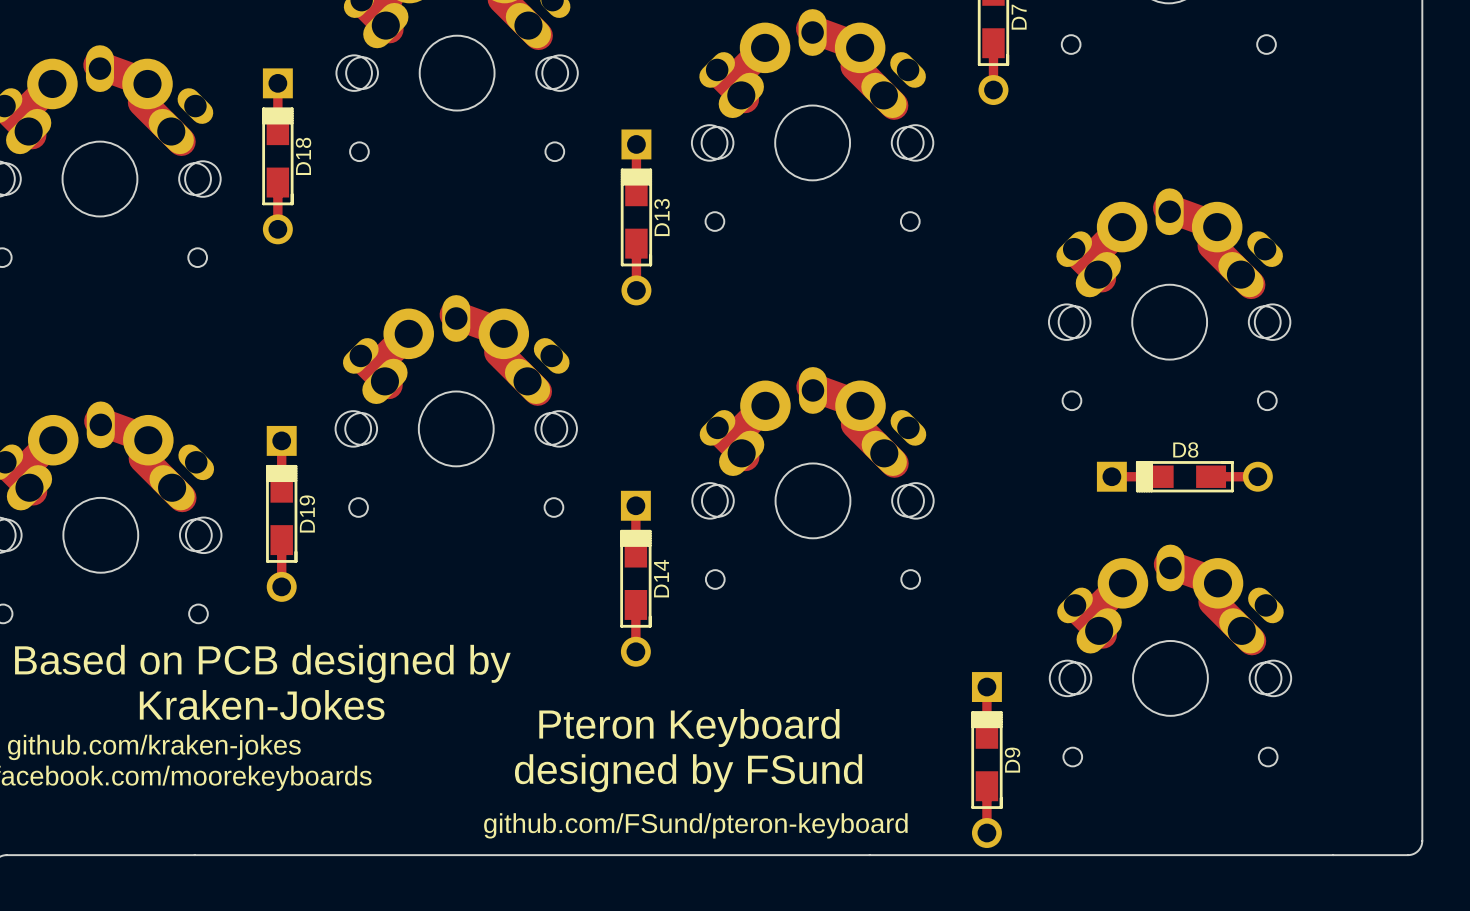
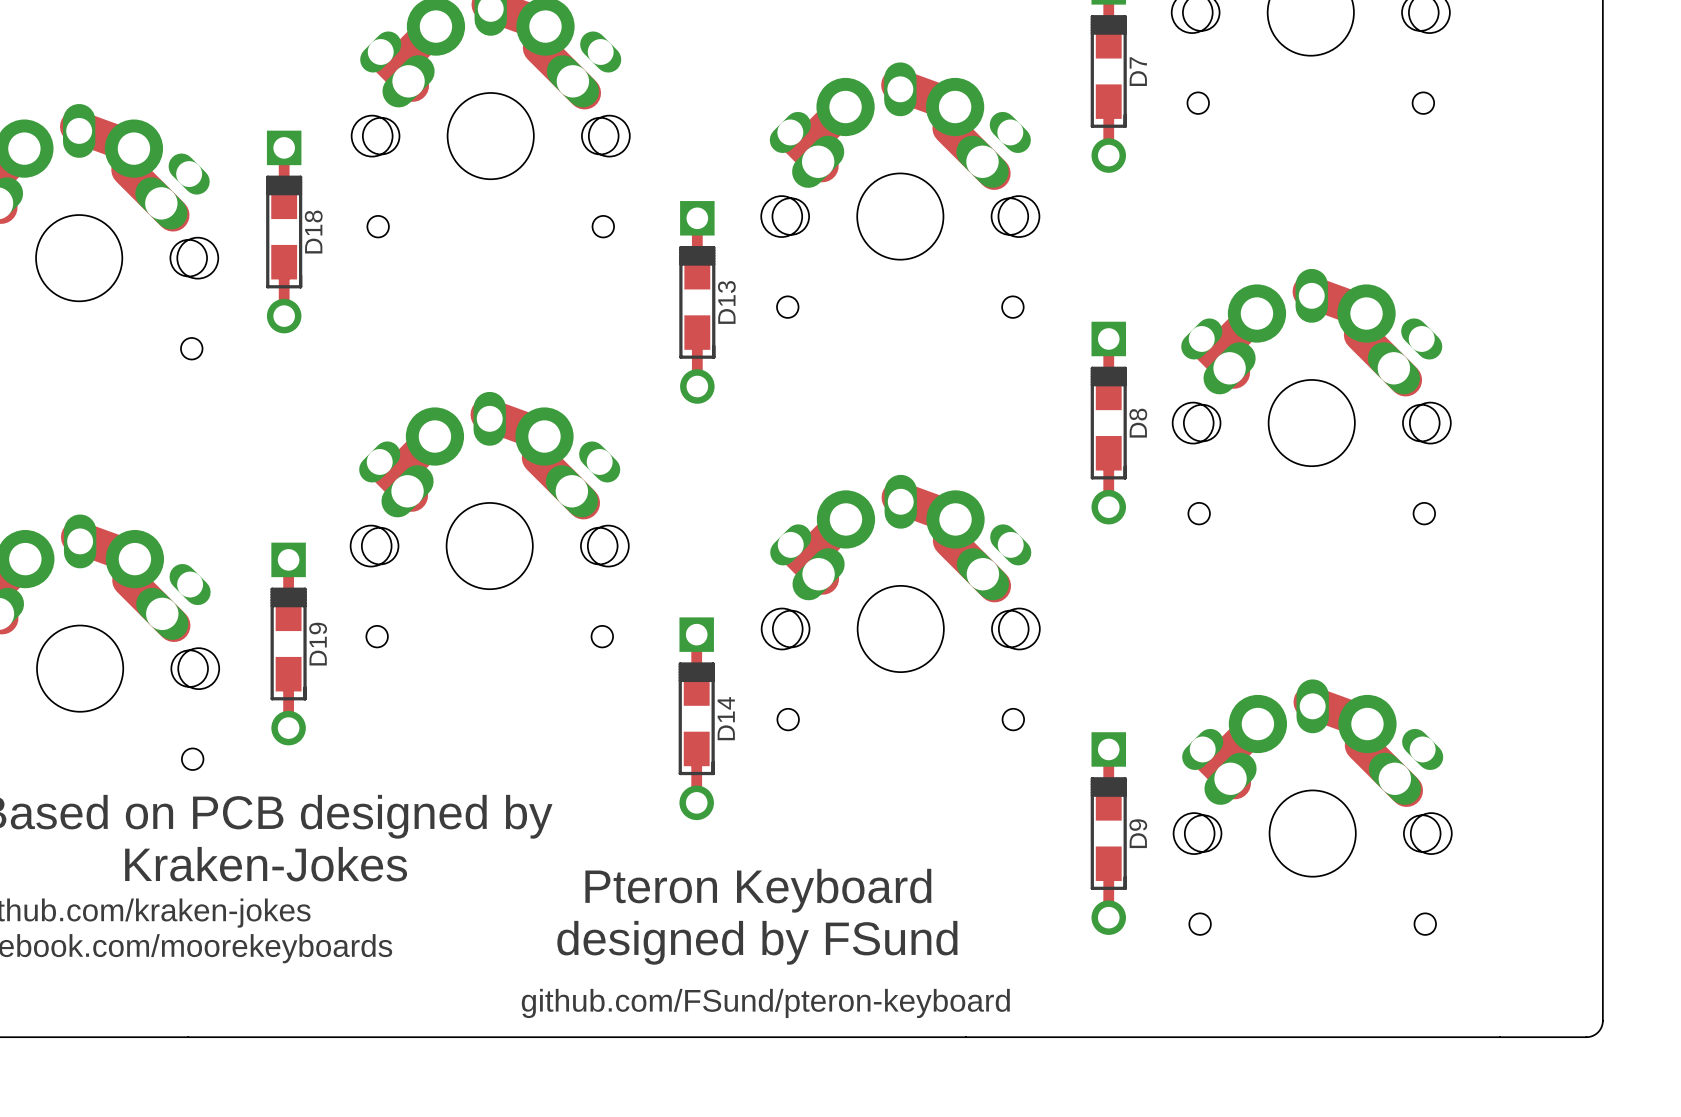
D8 rotation: 0° (1184, 476) -> 90° clockwise (1108, 423)
D8 position: (1184, 476) -> (1108, 423)
D9 position: (986, 760) -> (1108, 833)

